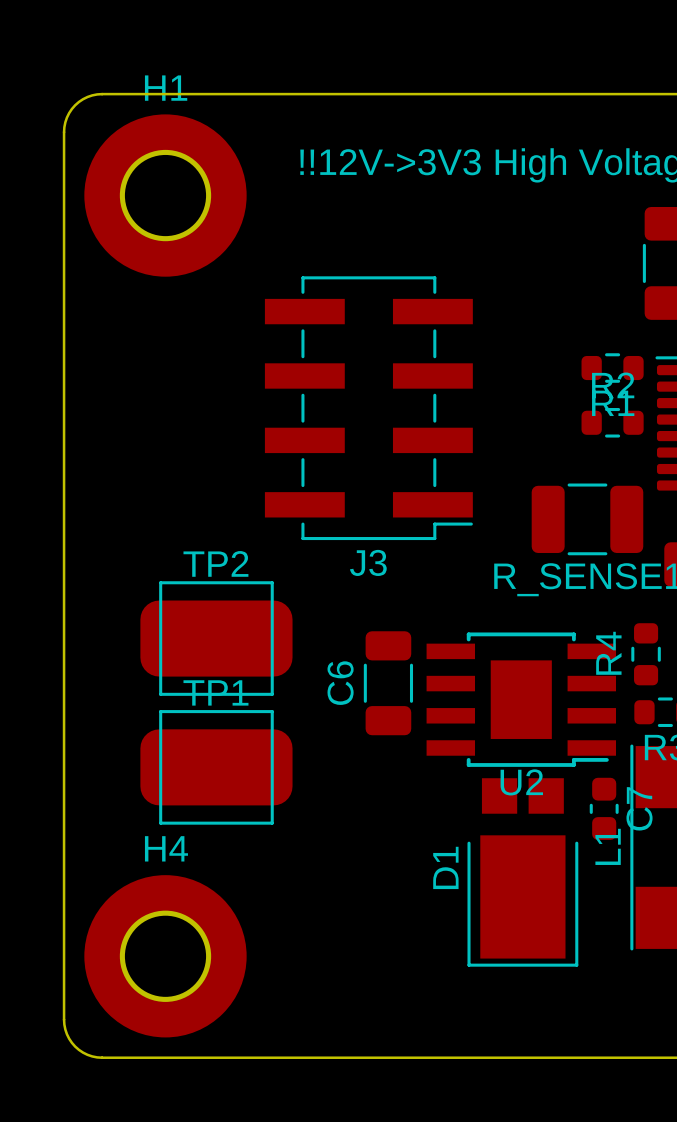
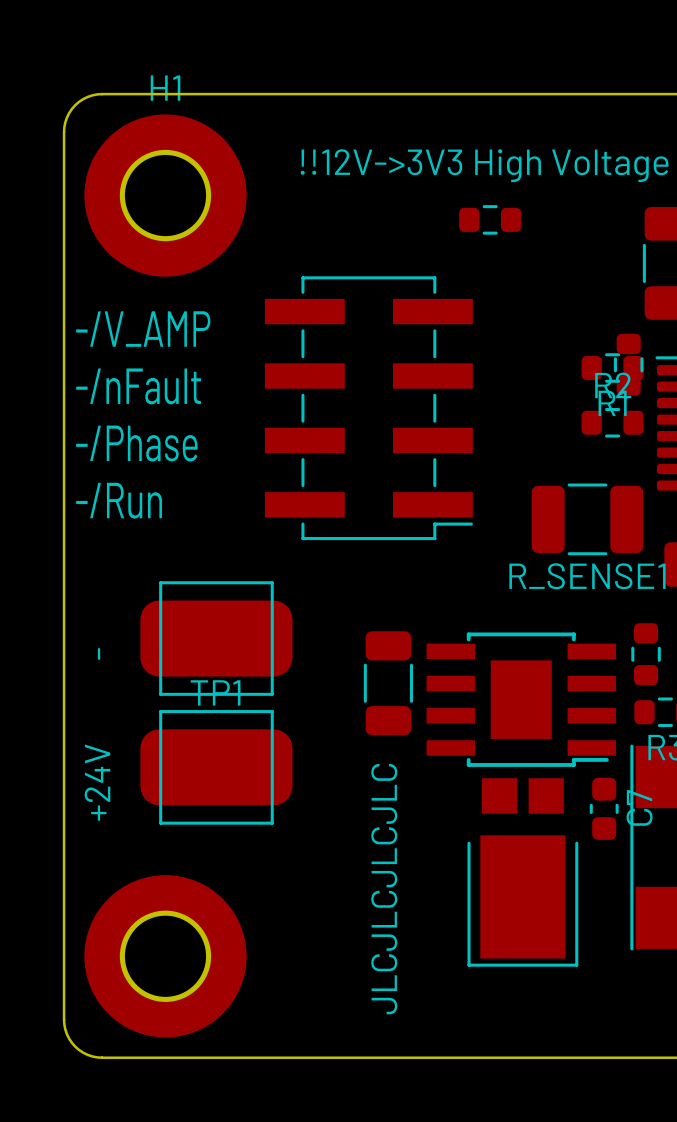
part: none -> (490, 219)
text: none -> -/V_AMP (143, 329)
part: none -> (628, 364)
text: none -> -/nFault (138, 386)
text: none -> -/Phase (136, 443)
text: none -> -/Run (119, 500)
J3 name: J3 (368, 562) -> none
TP2 name: TP2 (215, 563) -> none
R4 name: R4 (608, 653) -> none
text: none -> - (99, 653)
C6 name: C6 (340, 683) -> none
text: none -> +24V (97, 782)
U2 name: U2 (521, 782) -> none
L1 name: L1 (608, 846) -> none
H4 name: H4 (166, 848) -> none
D1 name: D1 (445, 867) -> none
text: none -> JLCJLCJLCJLC (384, 889)

